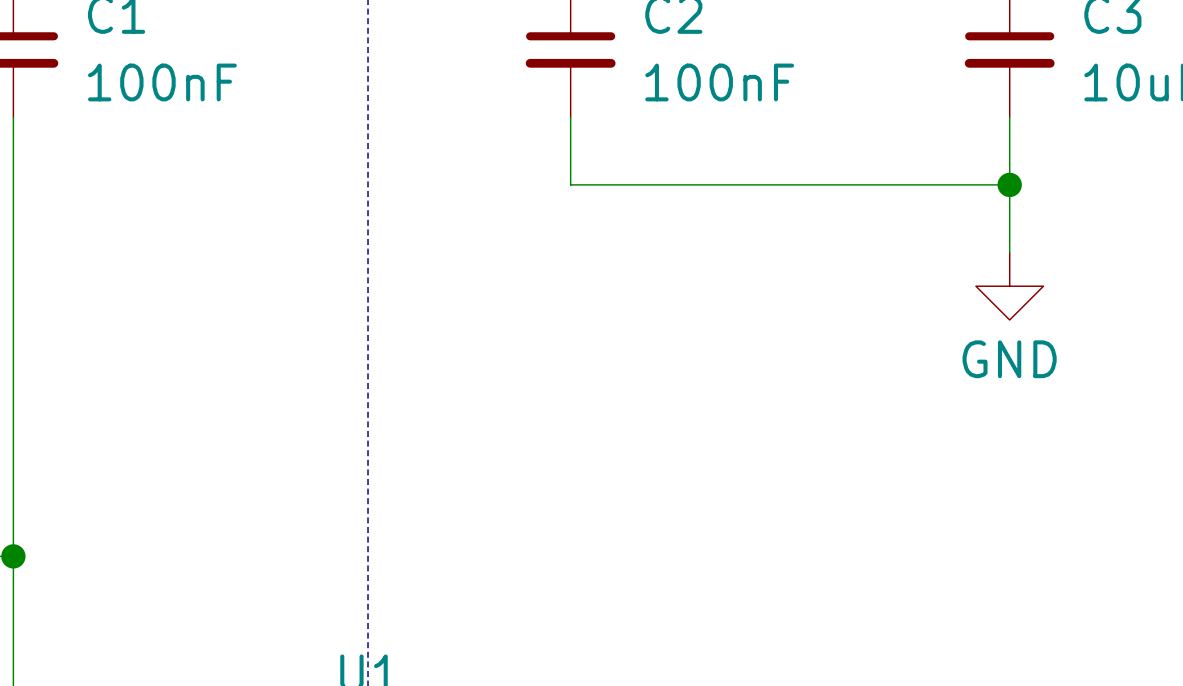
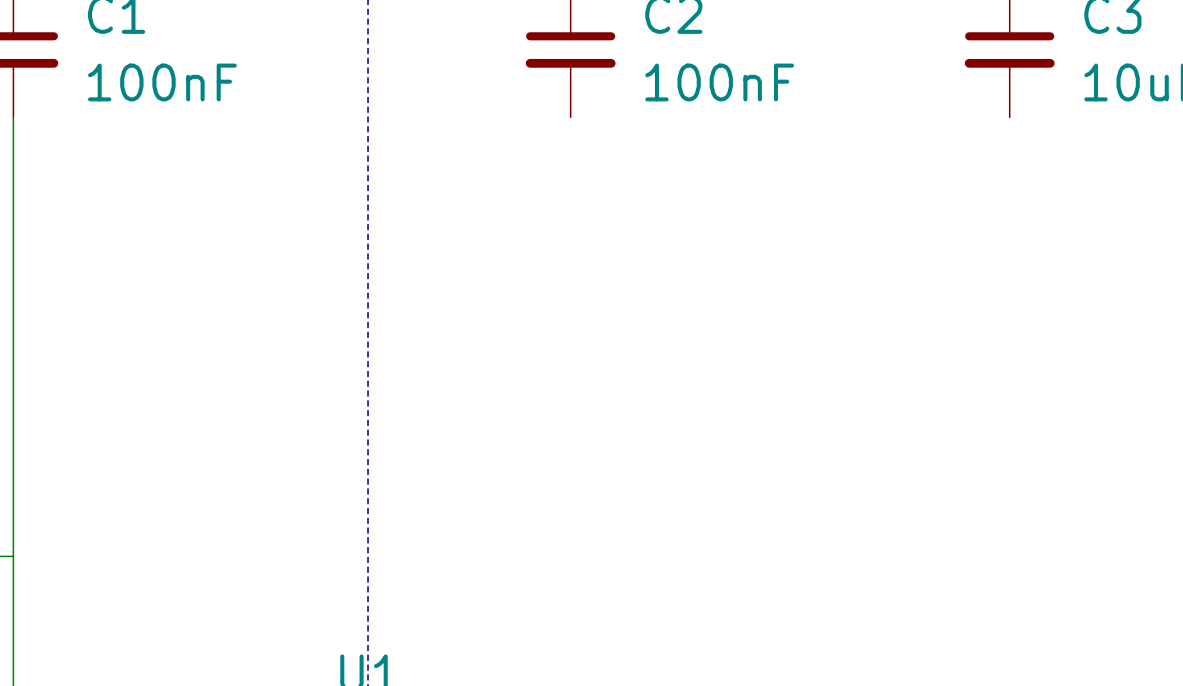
wire: (570, 117) (570, 184) (1009, 184) -> none
wire: (1009, 117) (1009, 252) -> none
junction: (1009, 184) -> none
power symbol: GND (1009, 286) -> none
junction: (13, 556) -> none

